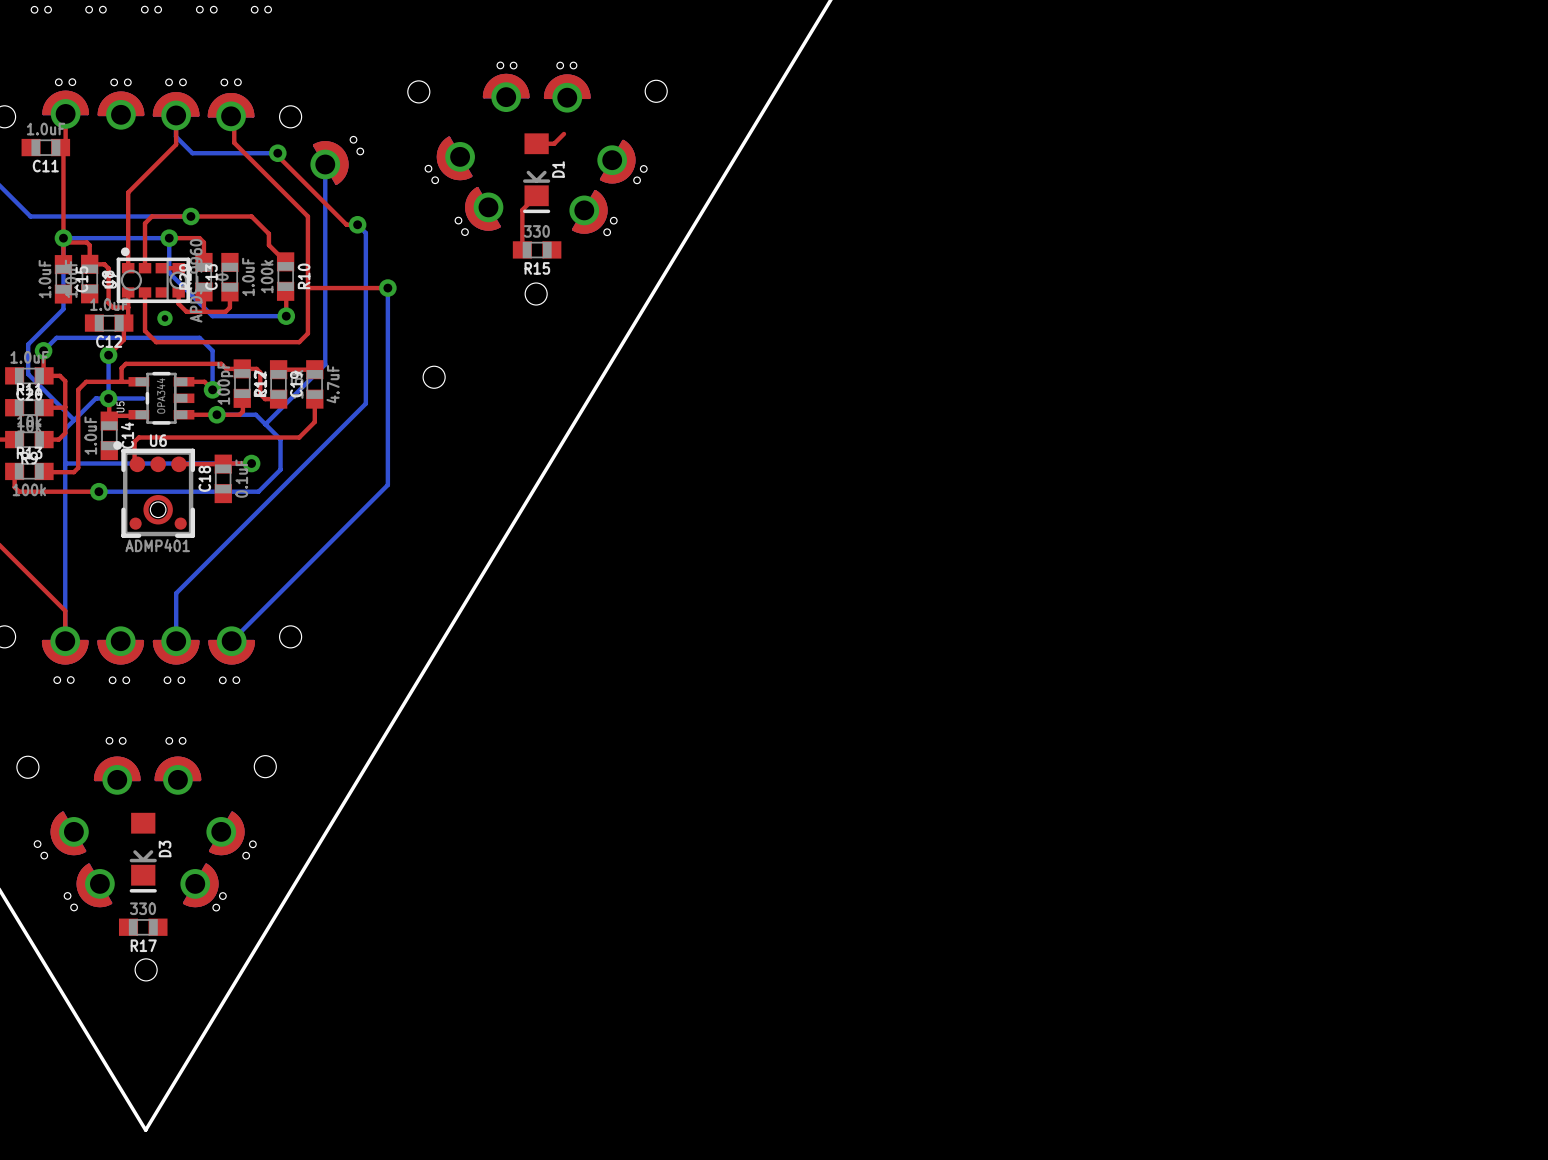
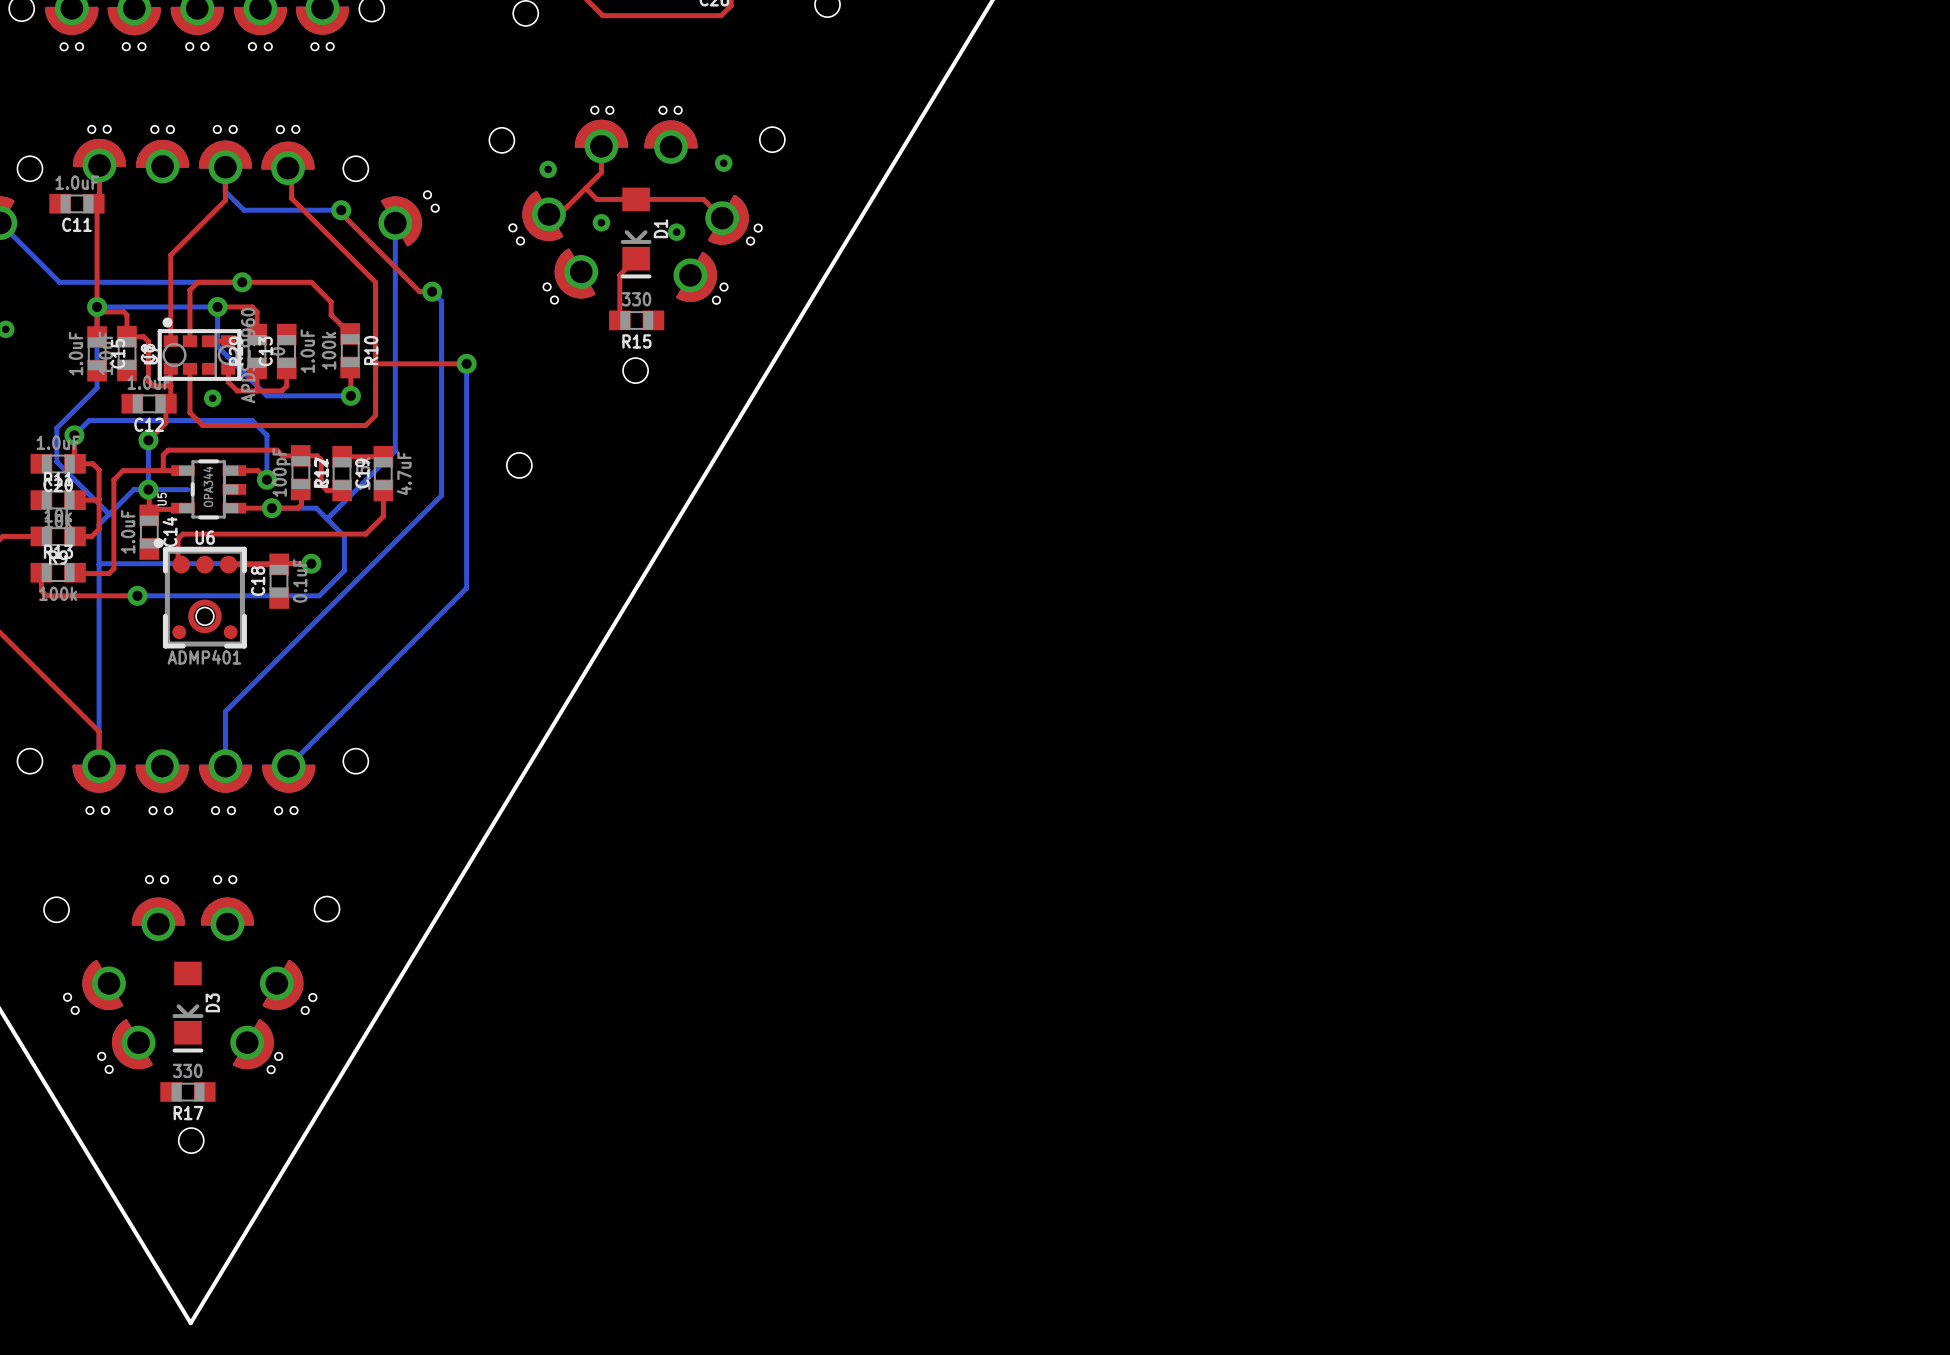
top track: none -> (601, 146) (601, 172) (559, 214) (548, 214)
via: none -> (723, 163)
via: none -> (548, 169)
top track: none -> (585, 188) (596, 199) (636, 199)
top track: (563, 133) (554, 143) -> (722, 218) (718, 218) (703, 199) (656, 199)
via: none -> (601, 222)
via: none -> (676, 232)

